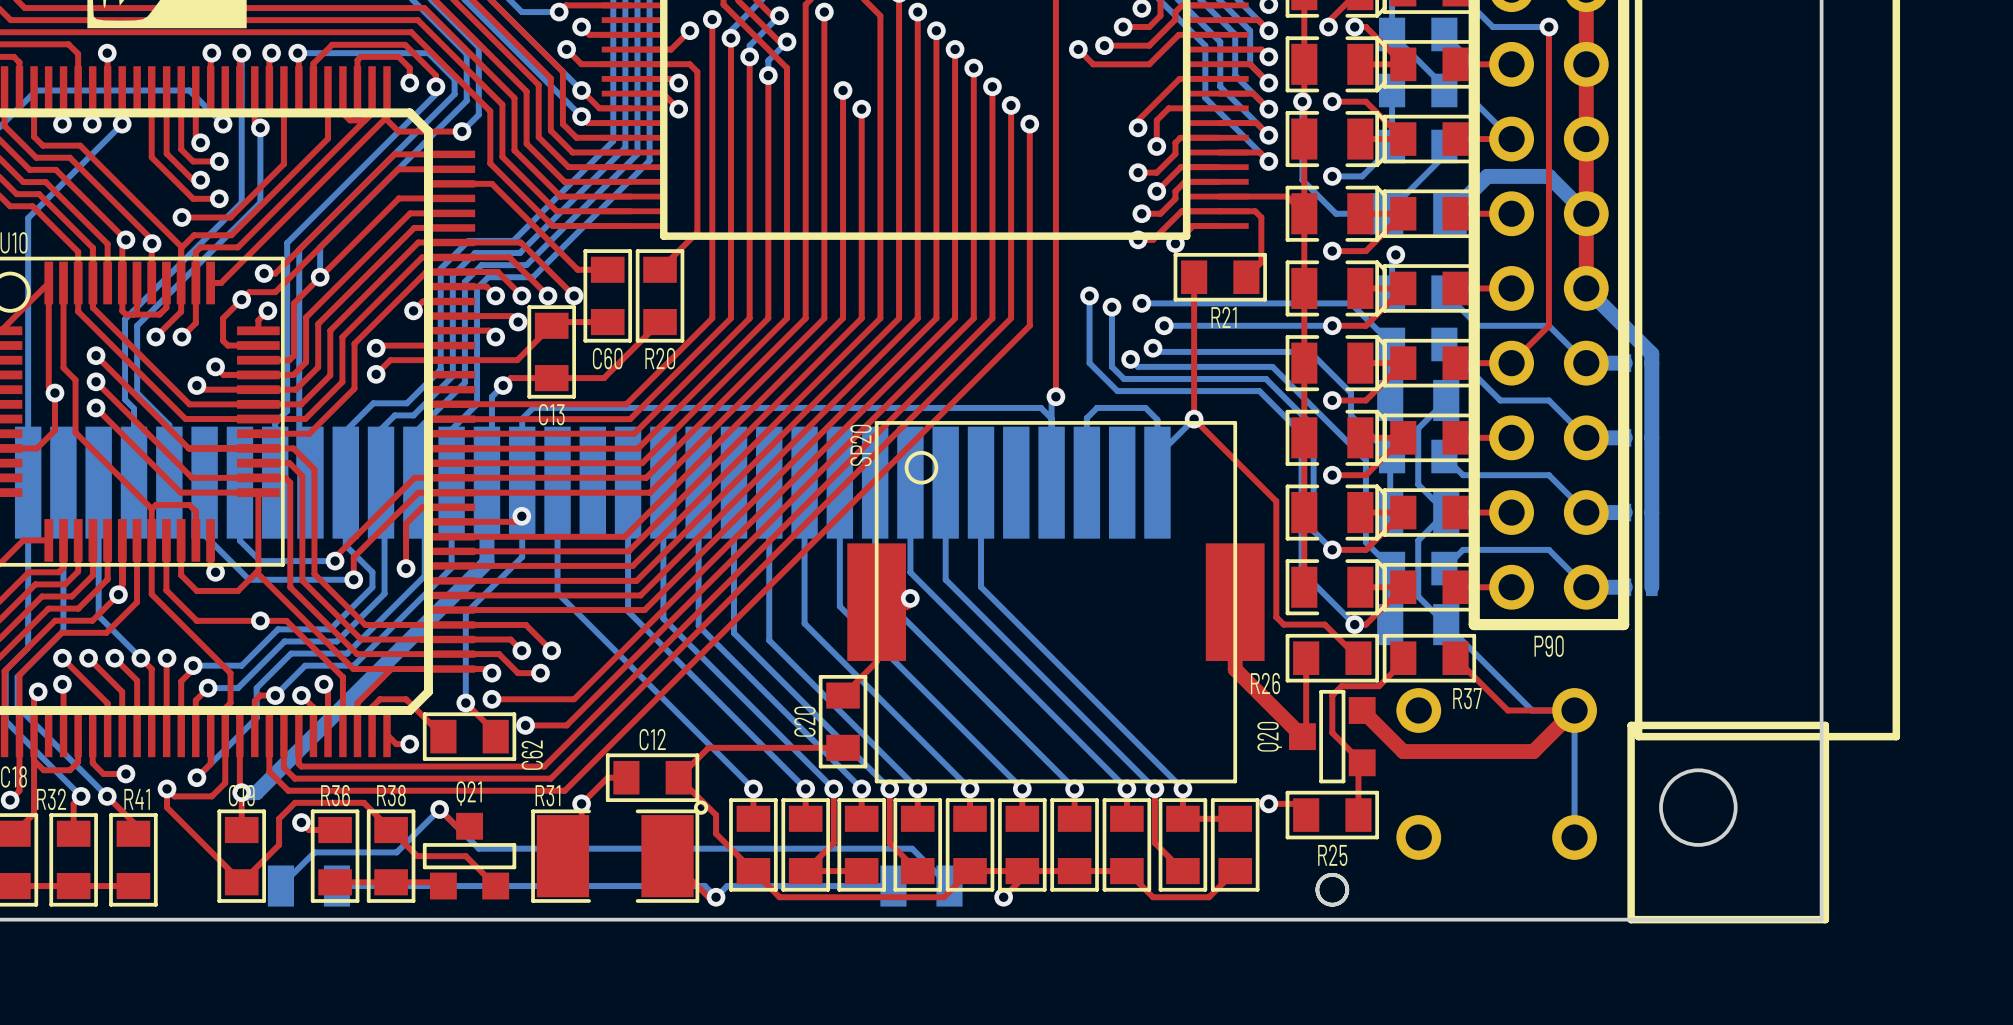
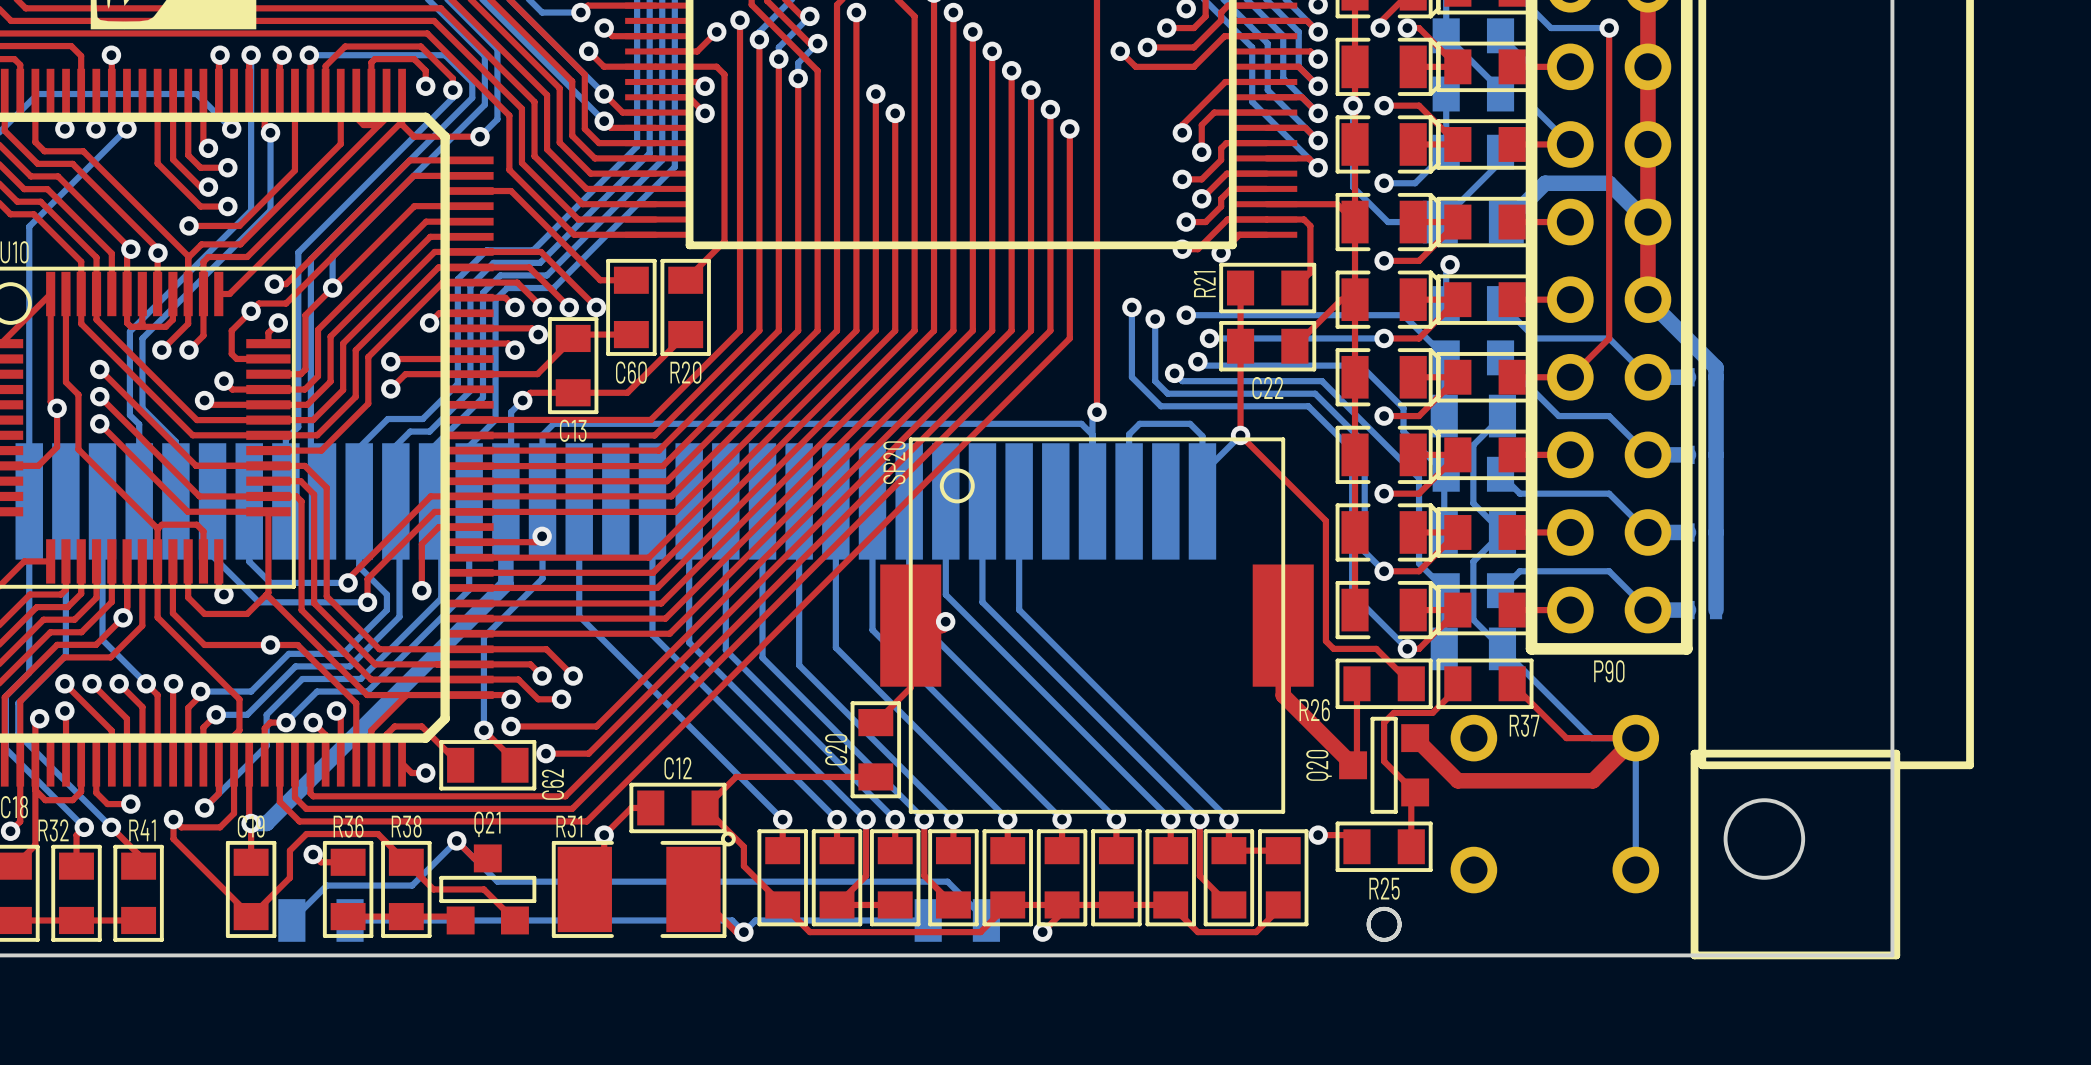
top track: none -> (1355, 299) (1341, 299) (1294, 346)
R21 name rotation: 0° (1224, 317) -> 90° counterclockwise (1204, 284)
R21 name position: R21 (1224, 317) -> R21 (1204, 284)
C22: none -> (1267, 346)

